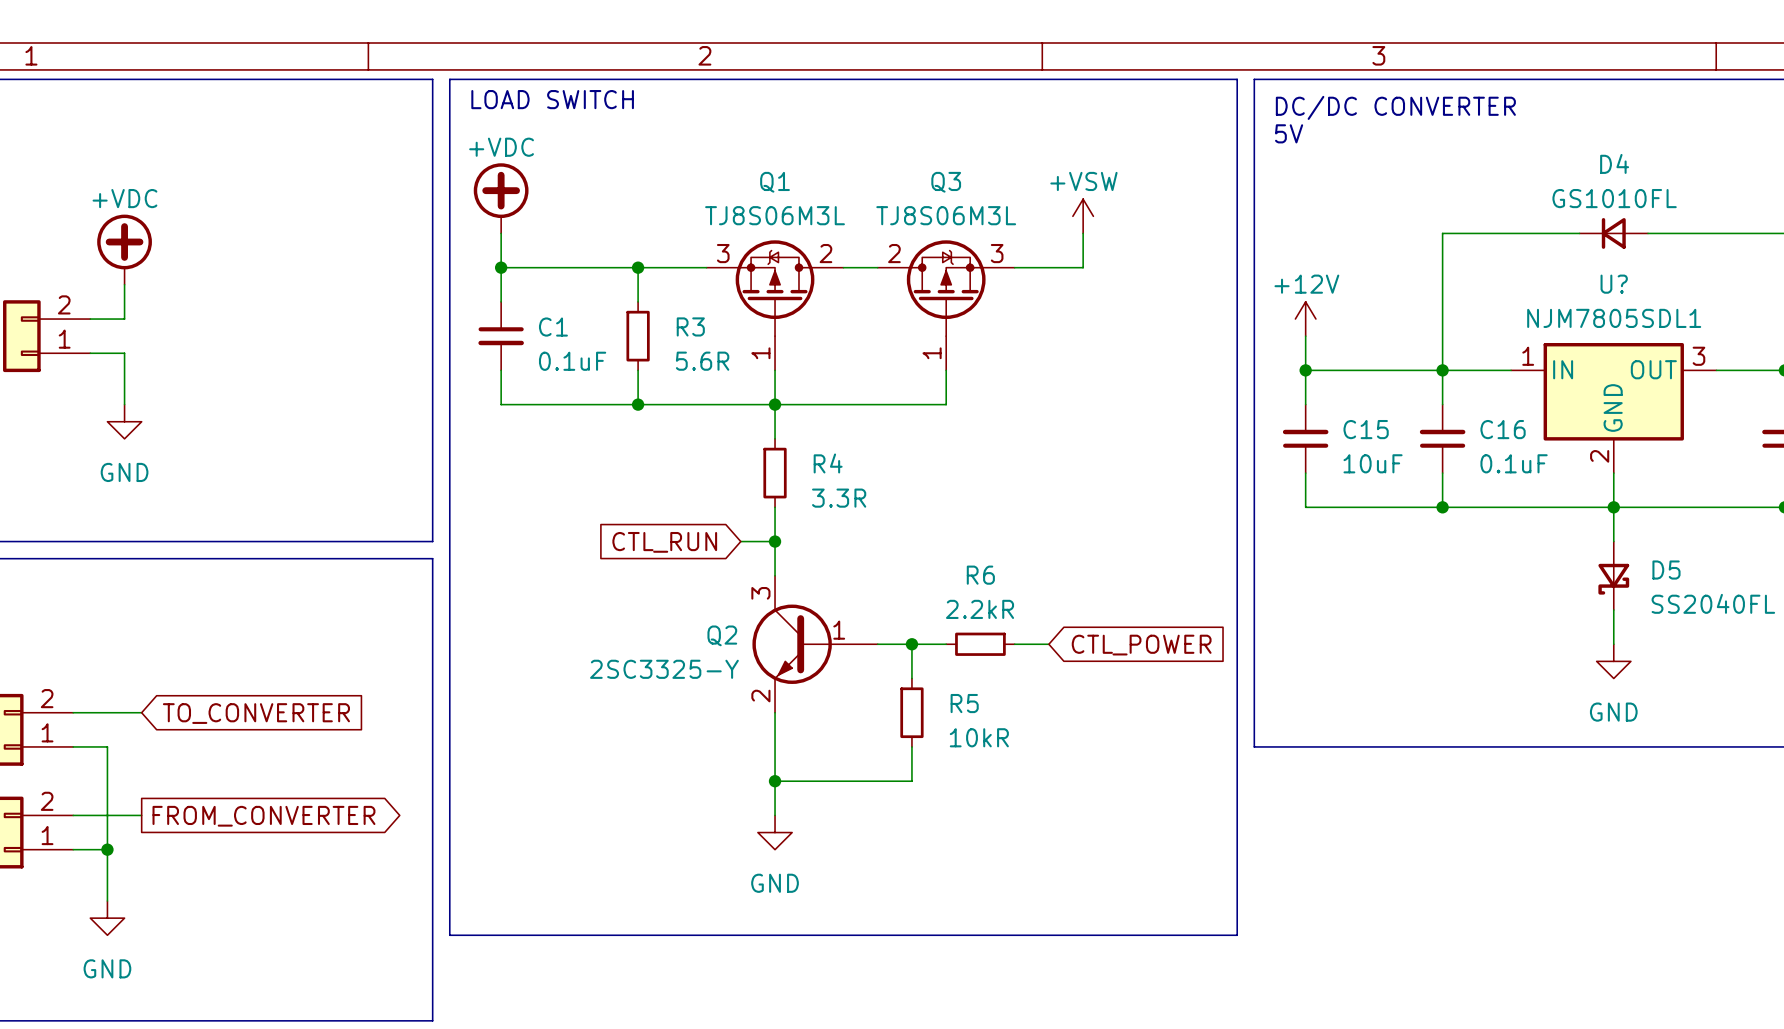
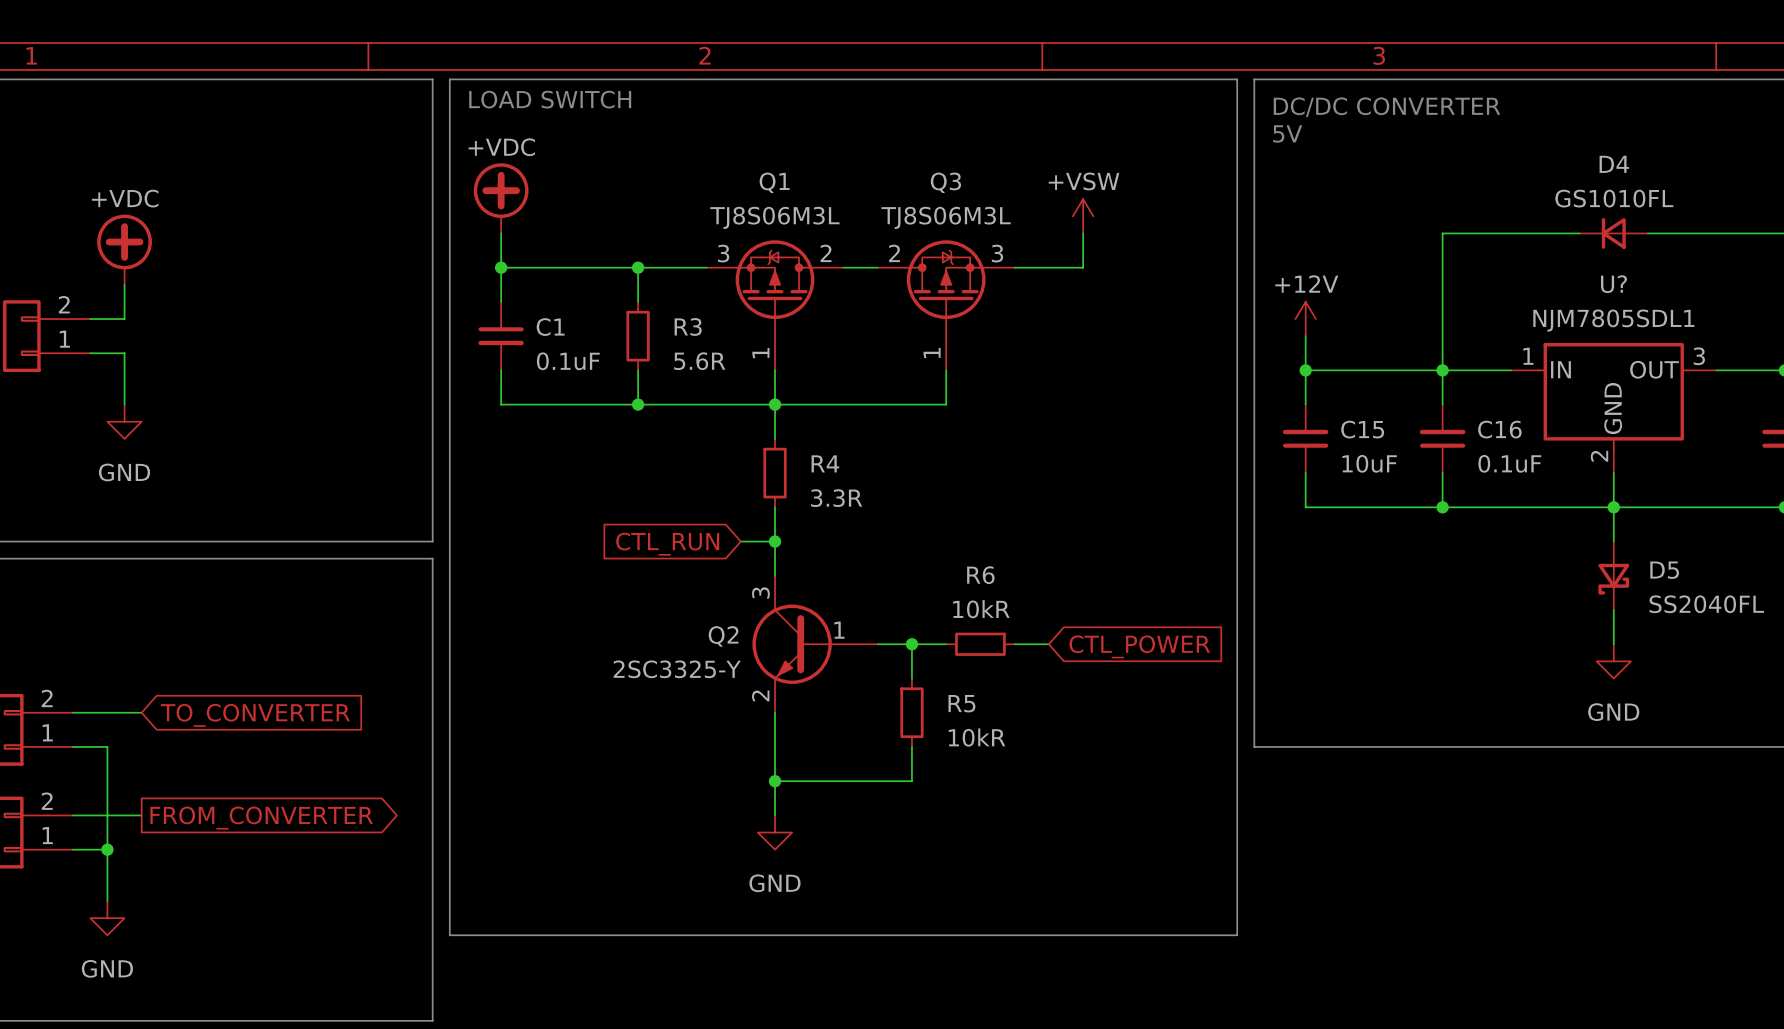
R6 value: 2.2kR (980, 609) -> 10kR (981, 609)

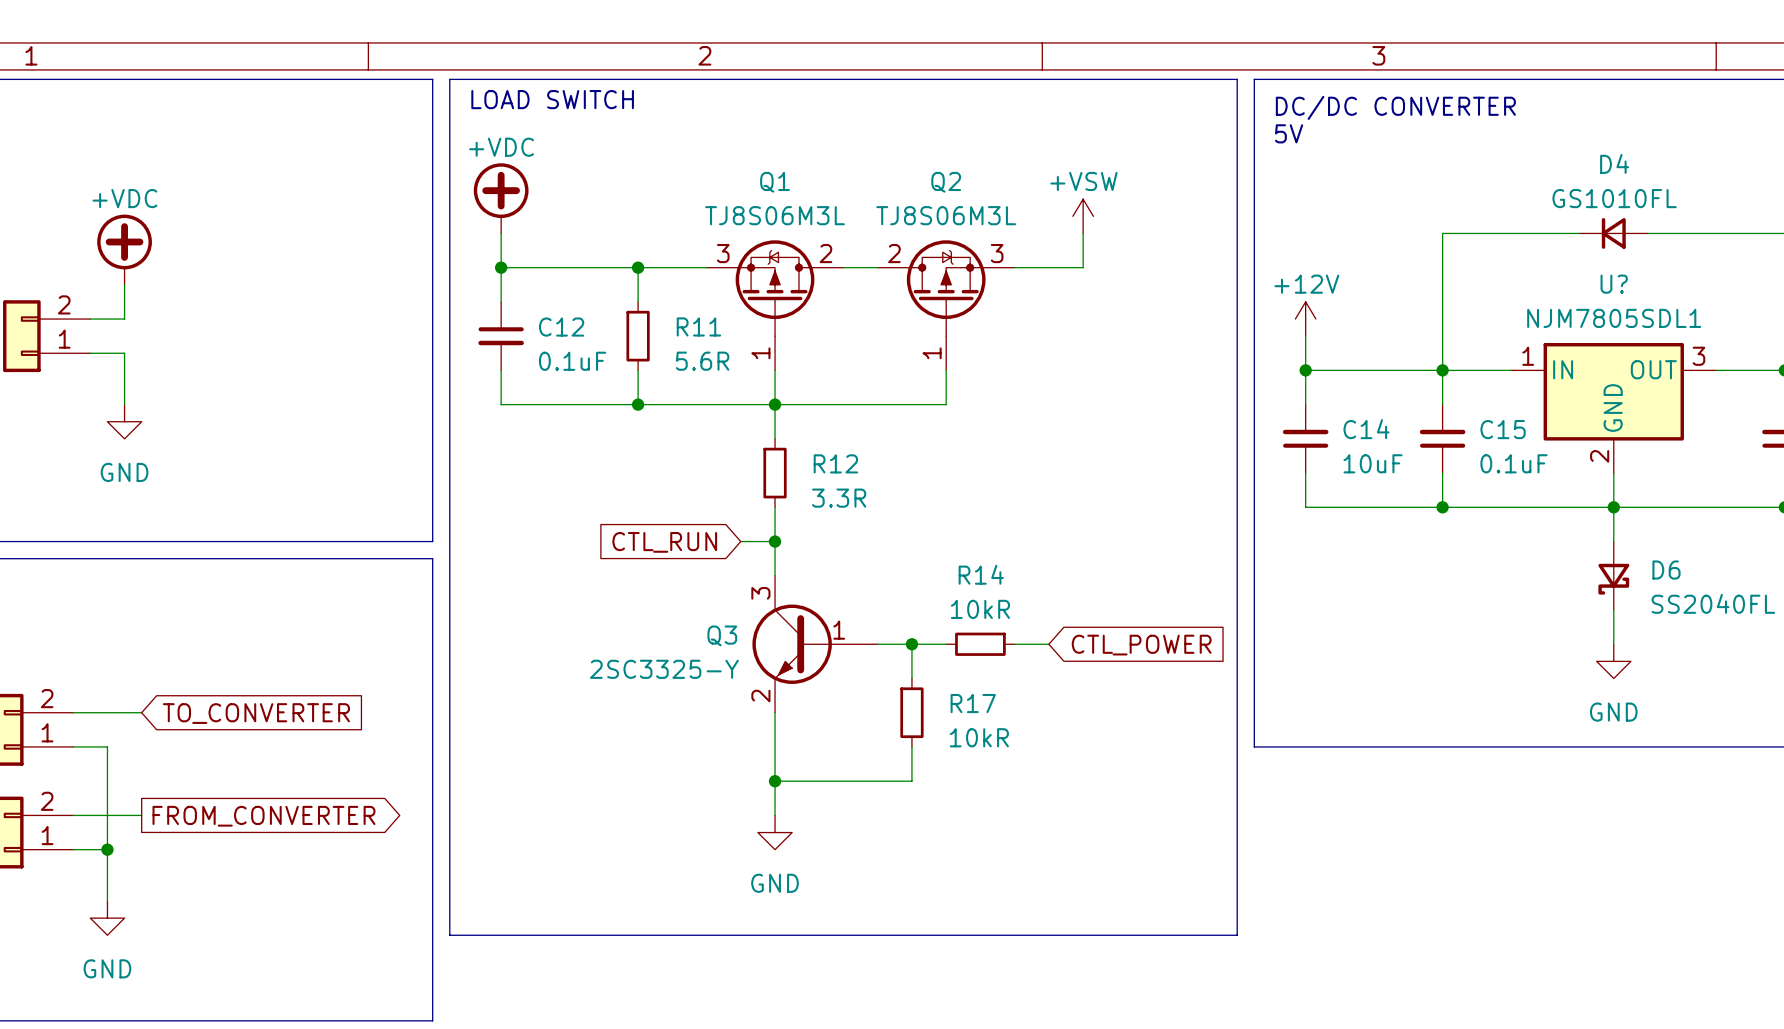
Q3 name: Q3 (945, 182) -> Q2 (946, 182)
R3 name: R3 (688, 326) -> R11 (698, 326)
C1 name: C1 (550, 327) -> C12 (561, 327)
C15 name: C15 (1362, 429) -> C14 (1366, 429)
C16 name: C16 (1499, 429) -> C15 (1503, 429)
R4 name: R4 (825, 463) -> R12 (835, 463)
D5 name: D5 (1664, 570) -> D6 (1666, 570)
R6 name: R6 (980, 575) -> R14 (981, 574)
Q2 name: Q2 (723, 636) -> Q3 (722, 635)
R5 name: R5 (961, 703) -> R17 (973, 703)

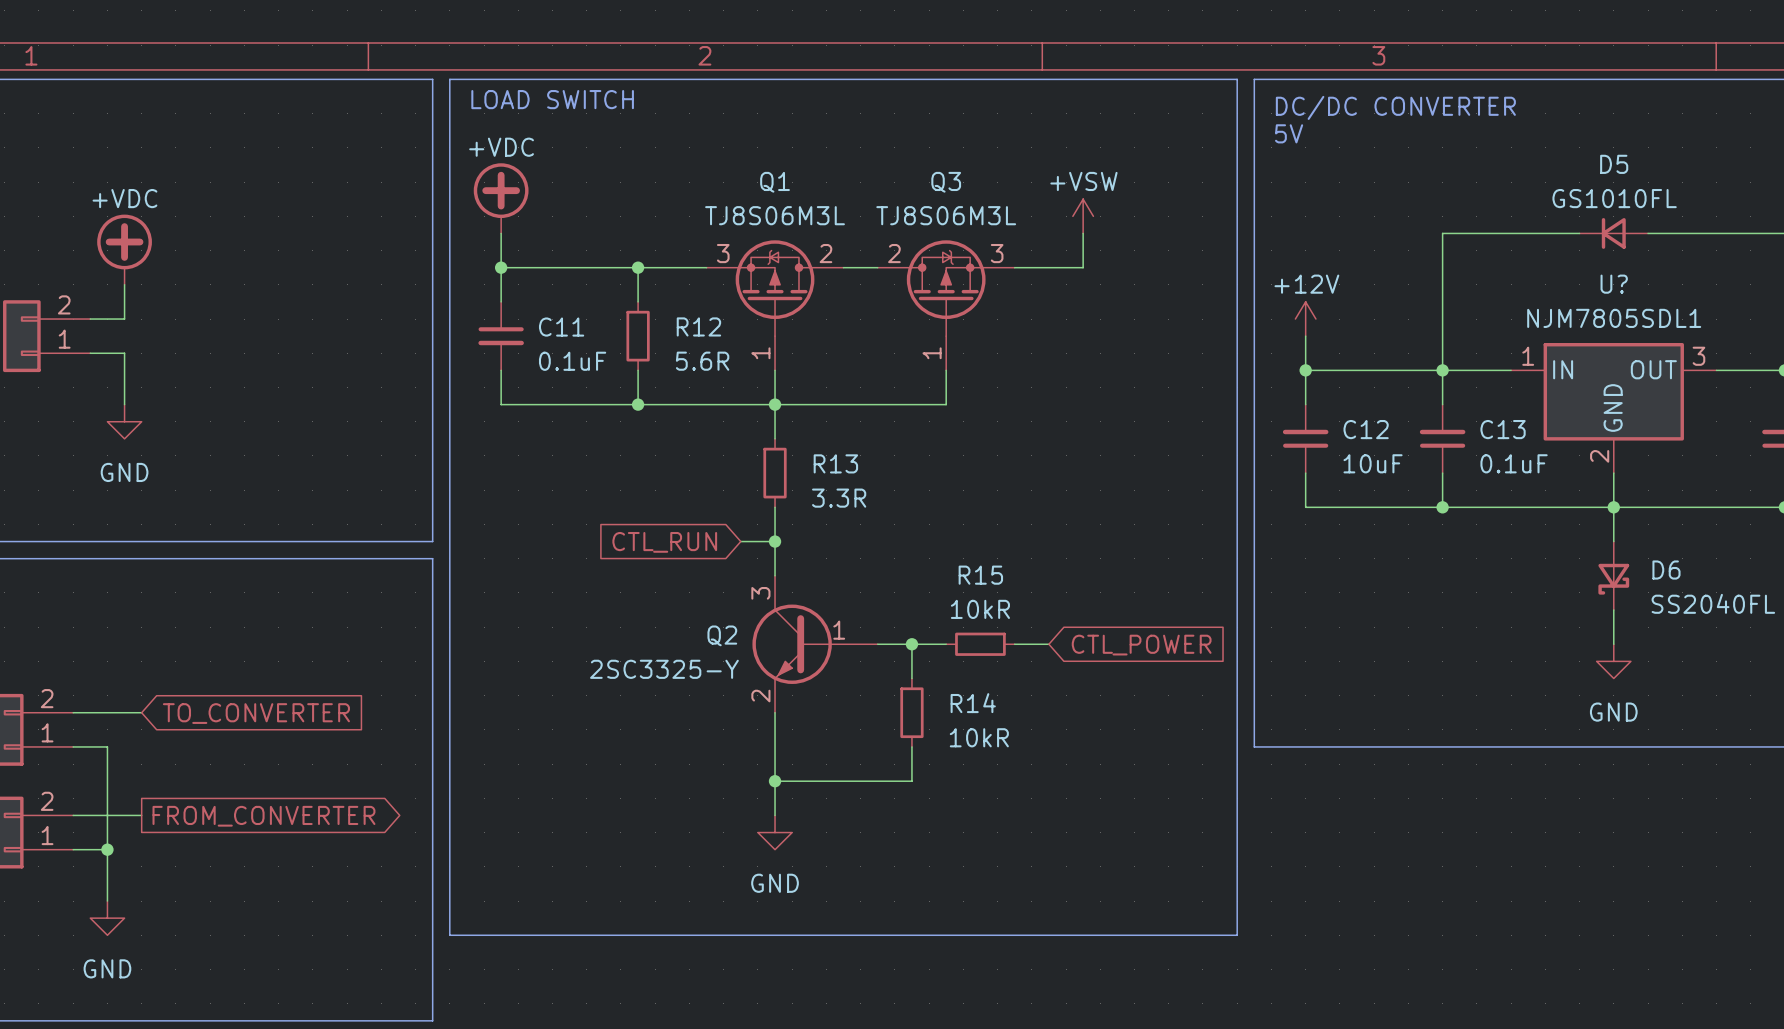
D4 name: D4 (1614, 163) -> D5 (1614, 164)
Q2 name: Q2 (946, 182) -> Q3 (946, 182)
R11 name: R11 (698, 326) -> R12 (698, 326)
C12 name: C12 (561, 327) -> C11 (561, 327)
C14 name: C14 (1366, 429) -> C12 (1366, 429)
C15 name: C15 (1503, 429) -> C13 (1503, 429)
R12 name: R12 (835, 463) -> R13 (835, 463)
R14 name: R14 (981, 574) -> R15 (980, 575)
Q3 name: Q3 (722, 635) -> Q2 (722, 635)
R17 name: R17 (973, 703) -> R14 (973, 703)

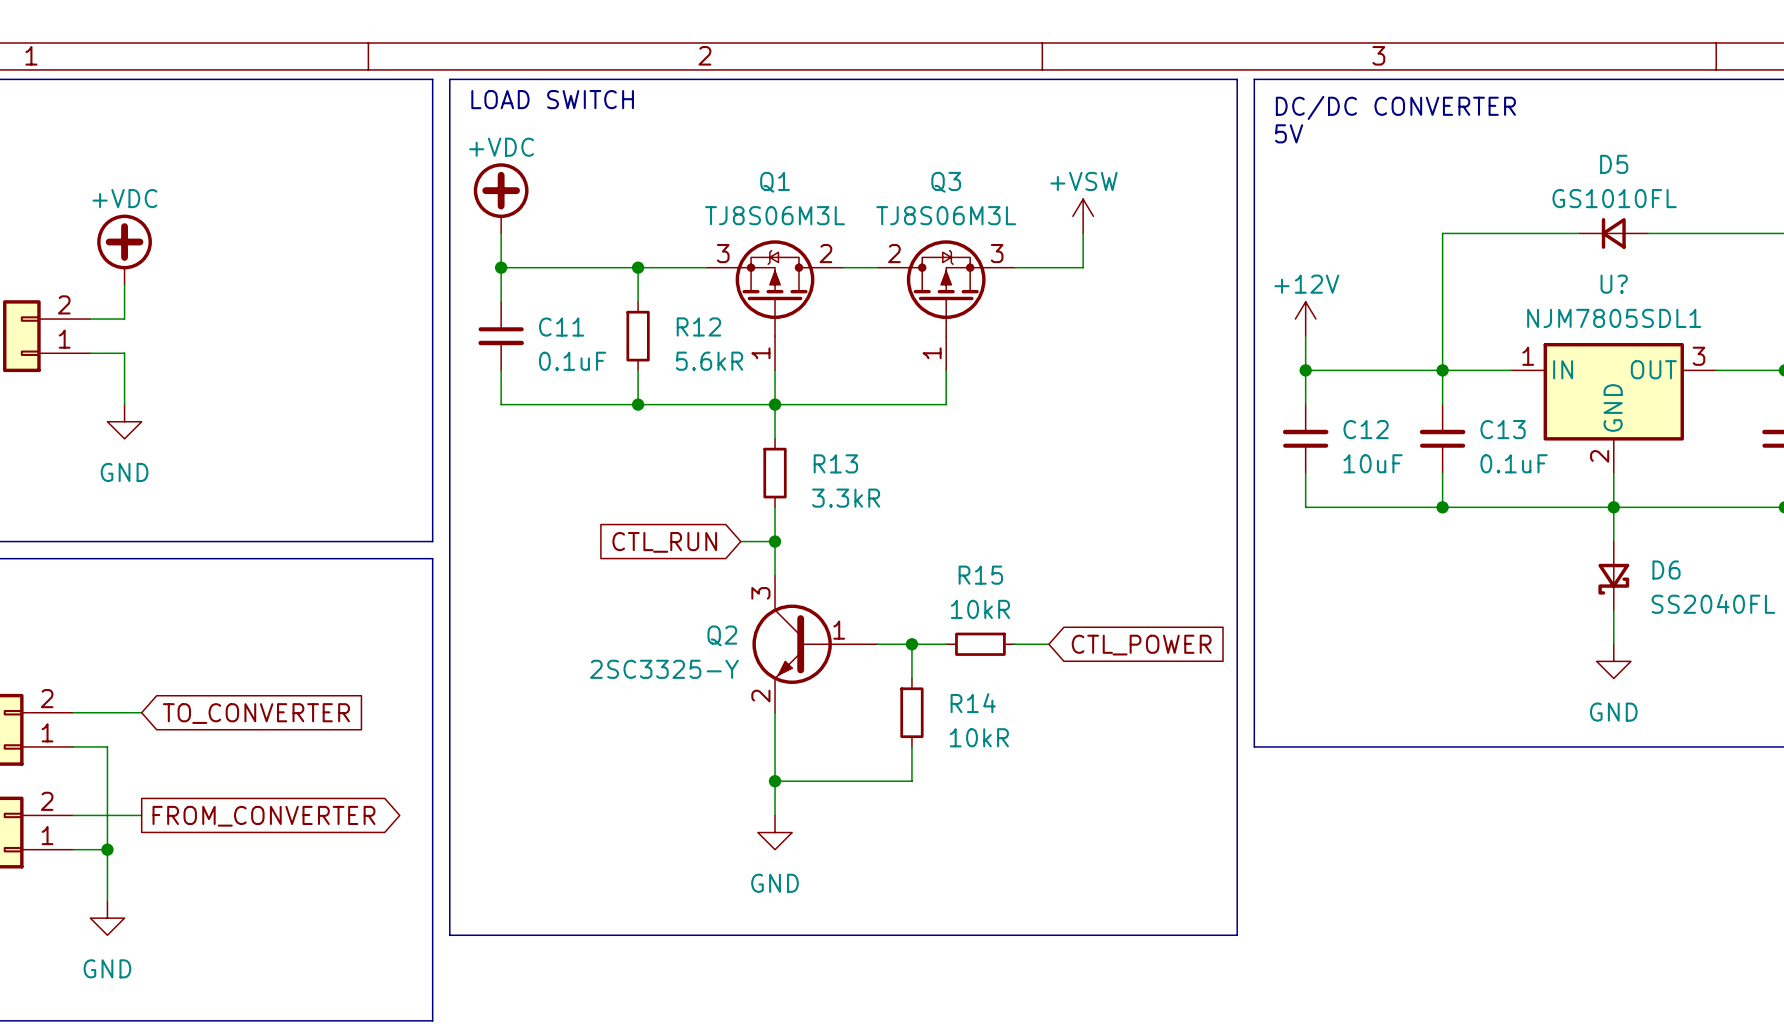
R12 value: 5.6R (702, 361) -> 5.6kR (709, 361)
R13 value: 3.3R (839, 498) -> 3.3kR (846, 498)

